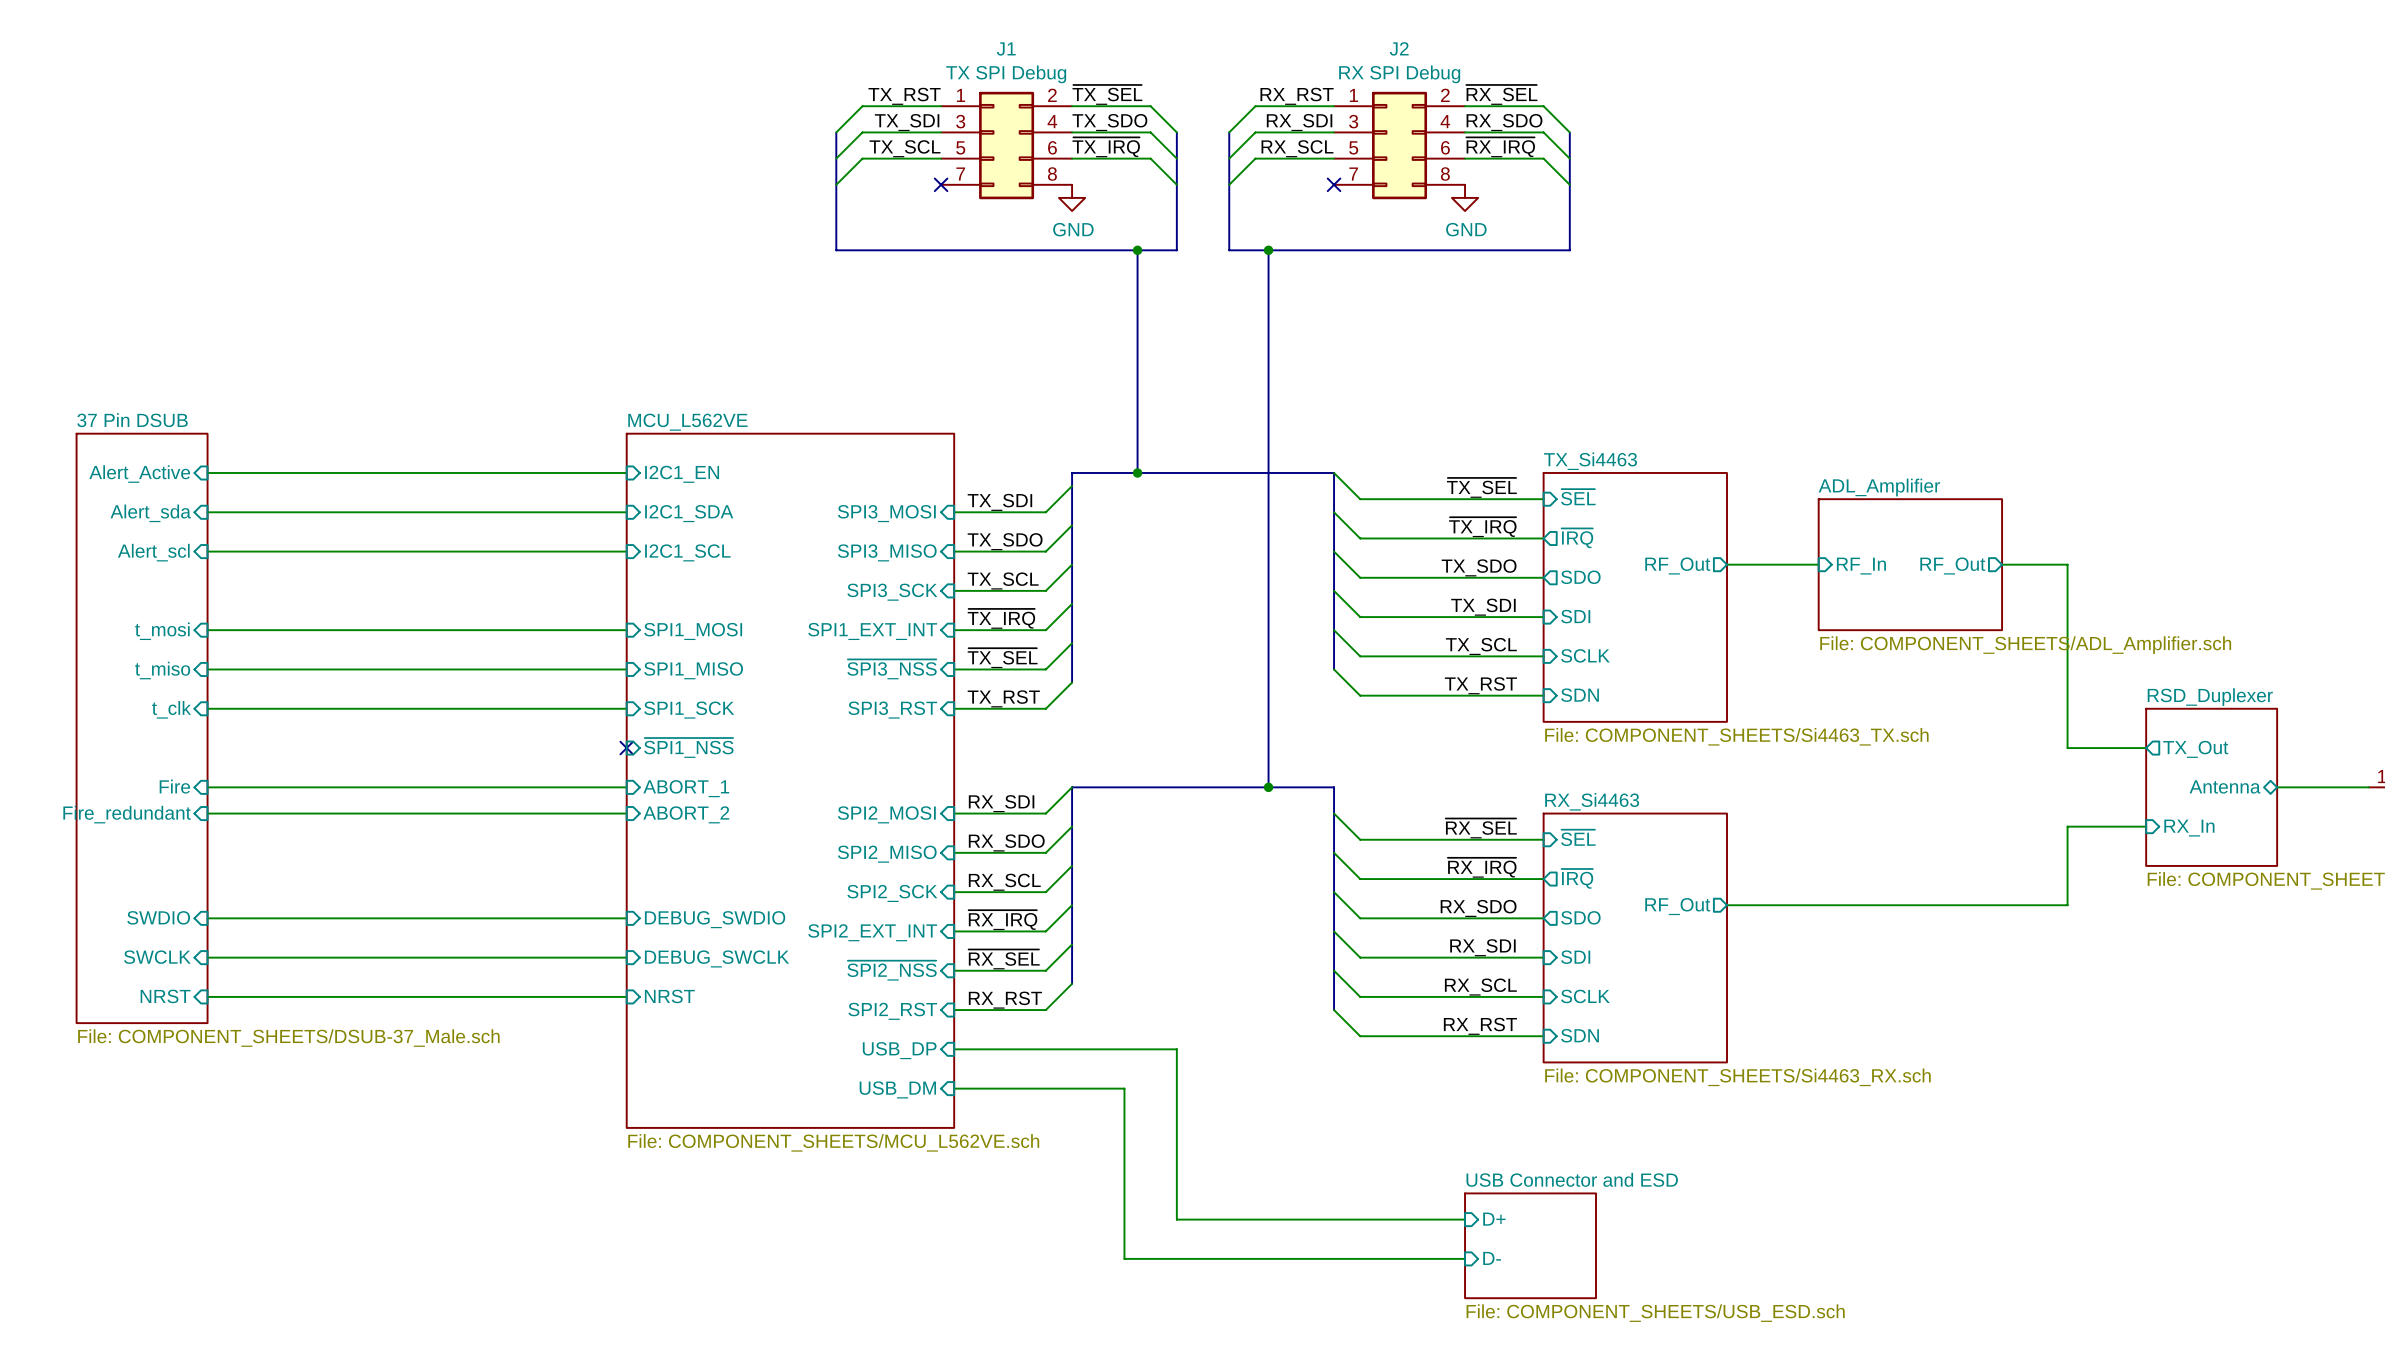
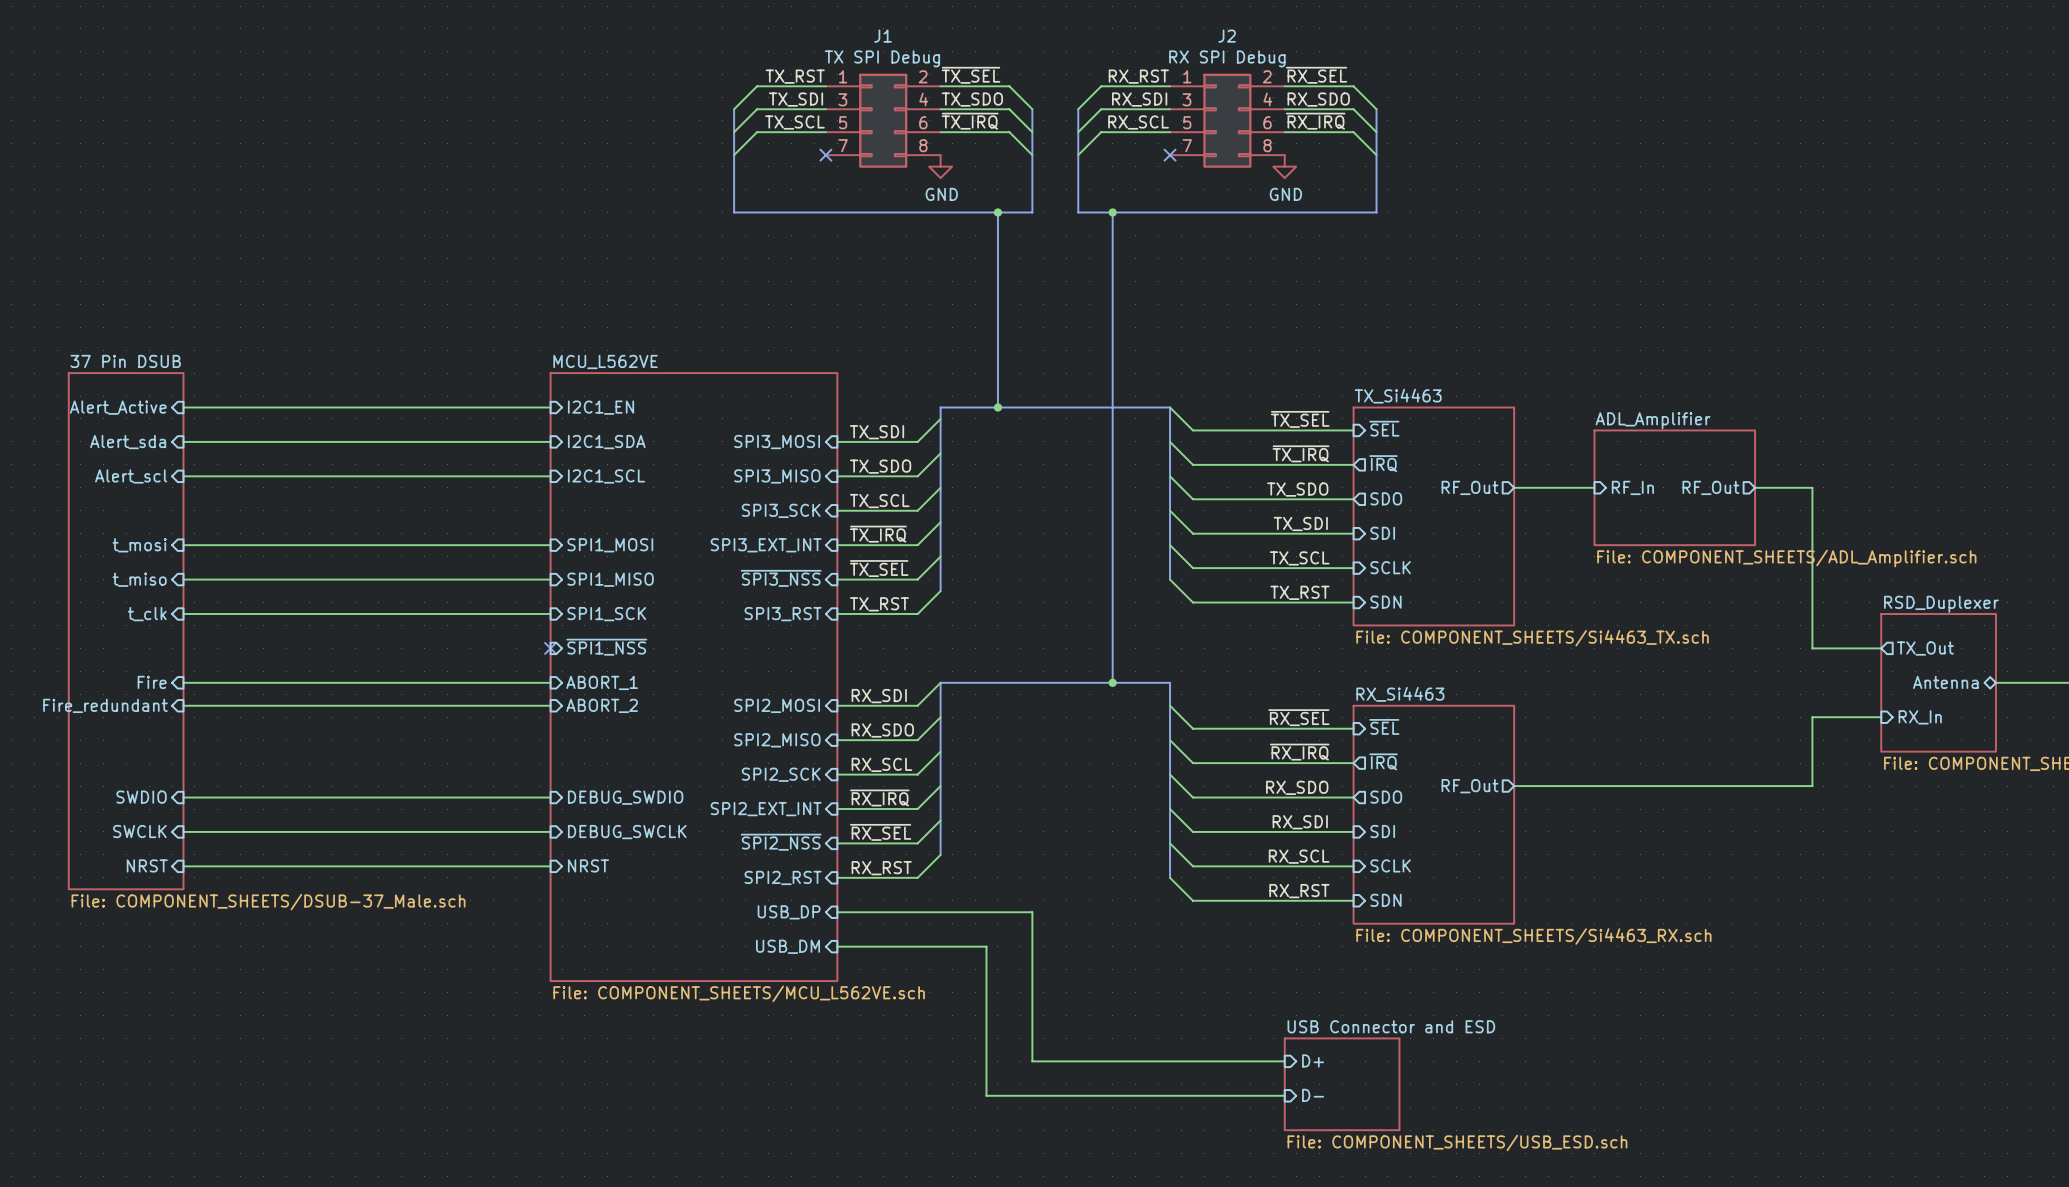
sheet pin: SPI1_EXT_INT (872, 631) -> SPI3_EXT_INT (766, 545)

